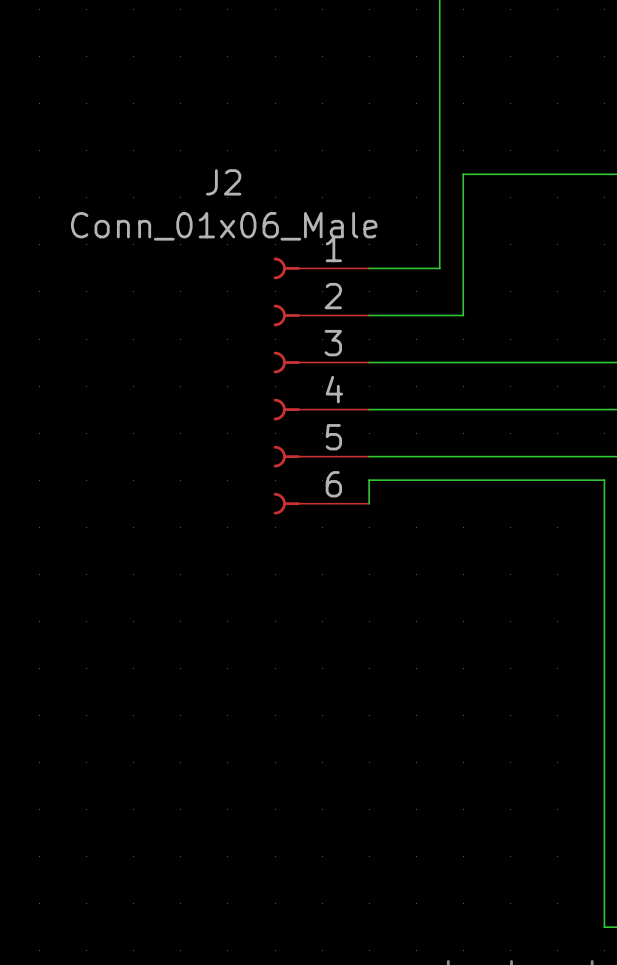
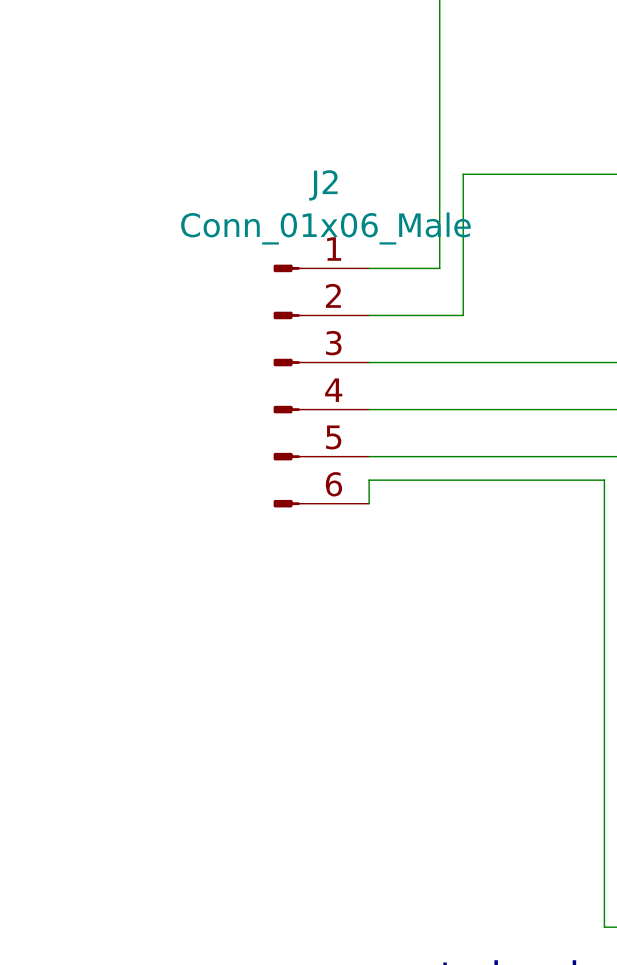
J2 name position: J2 (223, 182) -> J2 (323, 185)
J2 value position: Conn_01x06_Male (224, 226) -> Conn_01x06_Male (325, 228)
J2 symbol: [273, 257, 370, 515] -> [273, 264, 370, 508]

